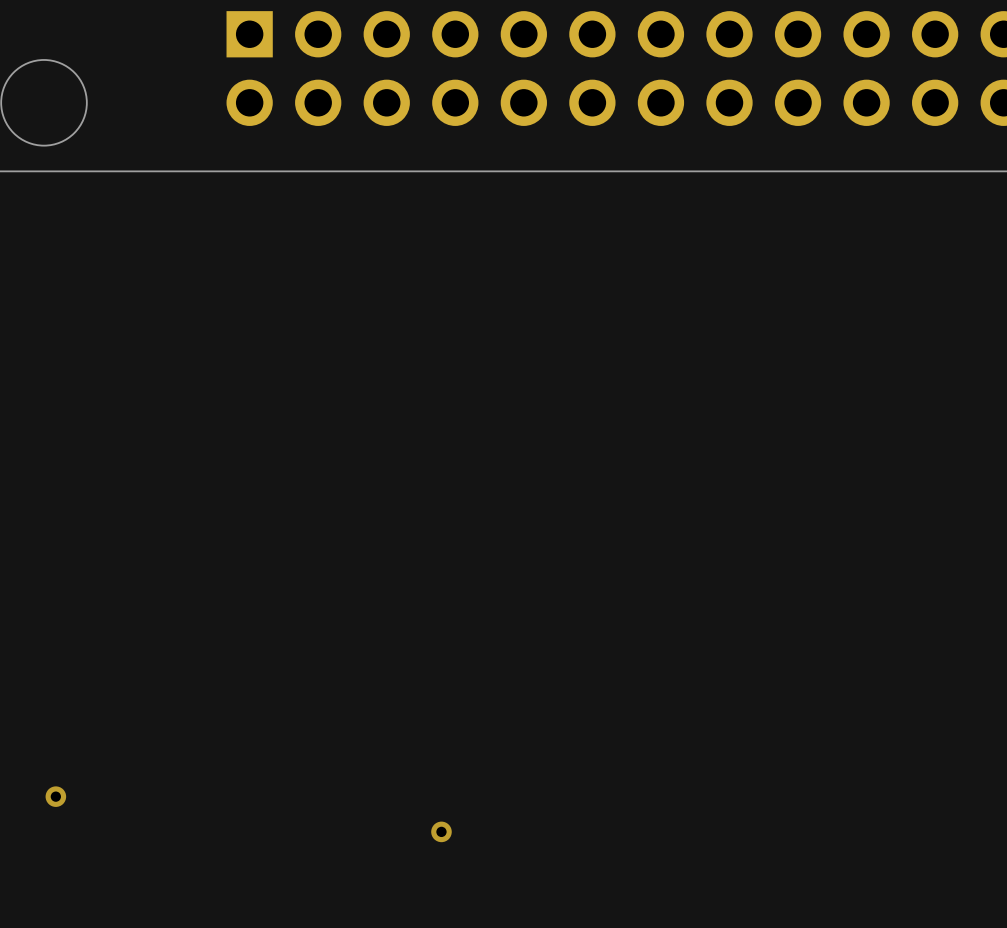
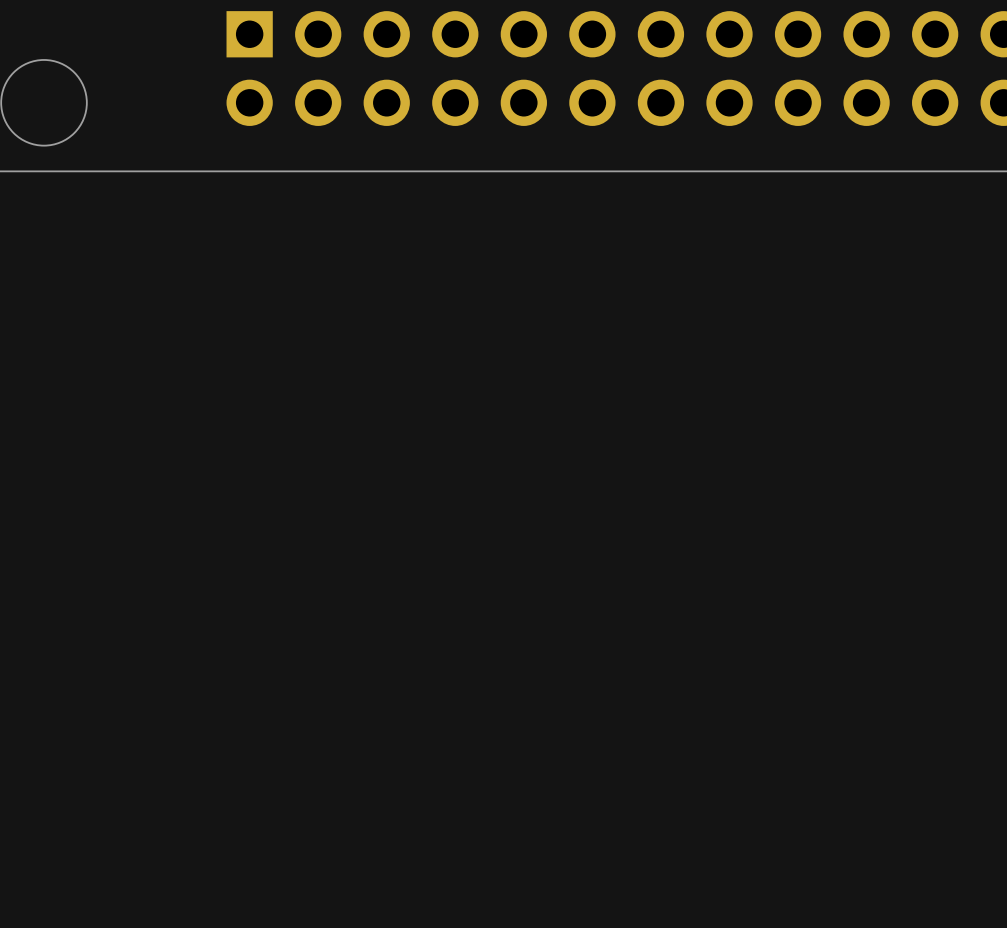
via: (55, 796) -> none
via: (441, 831) -> none

